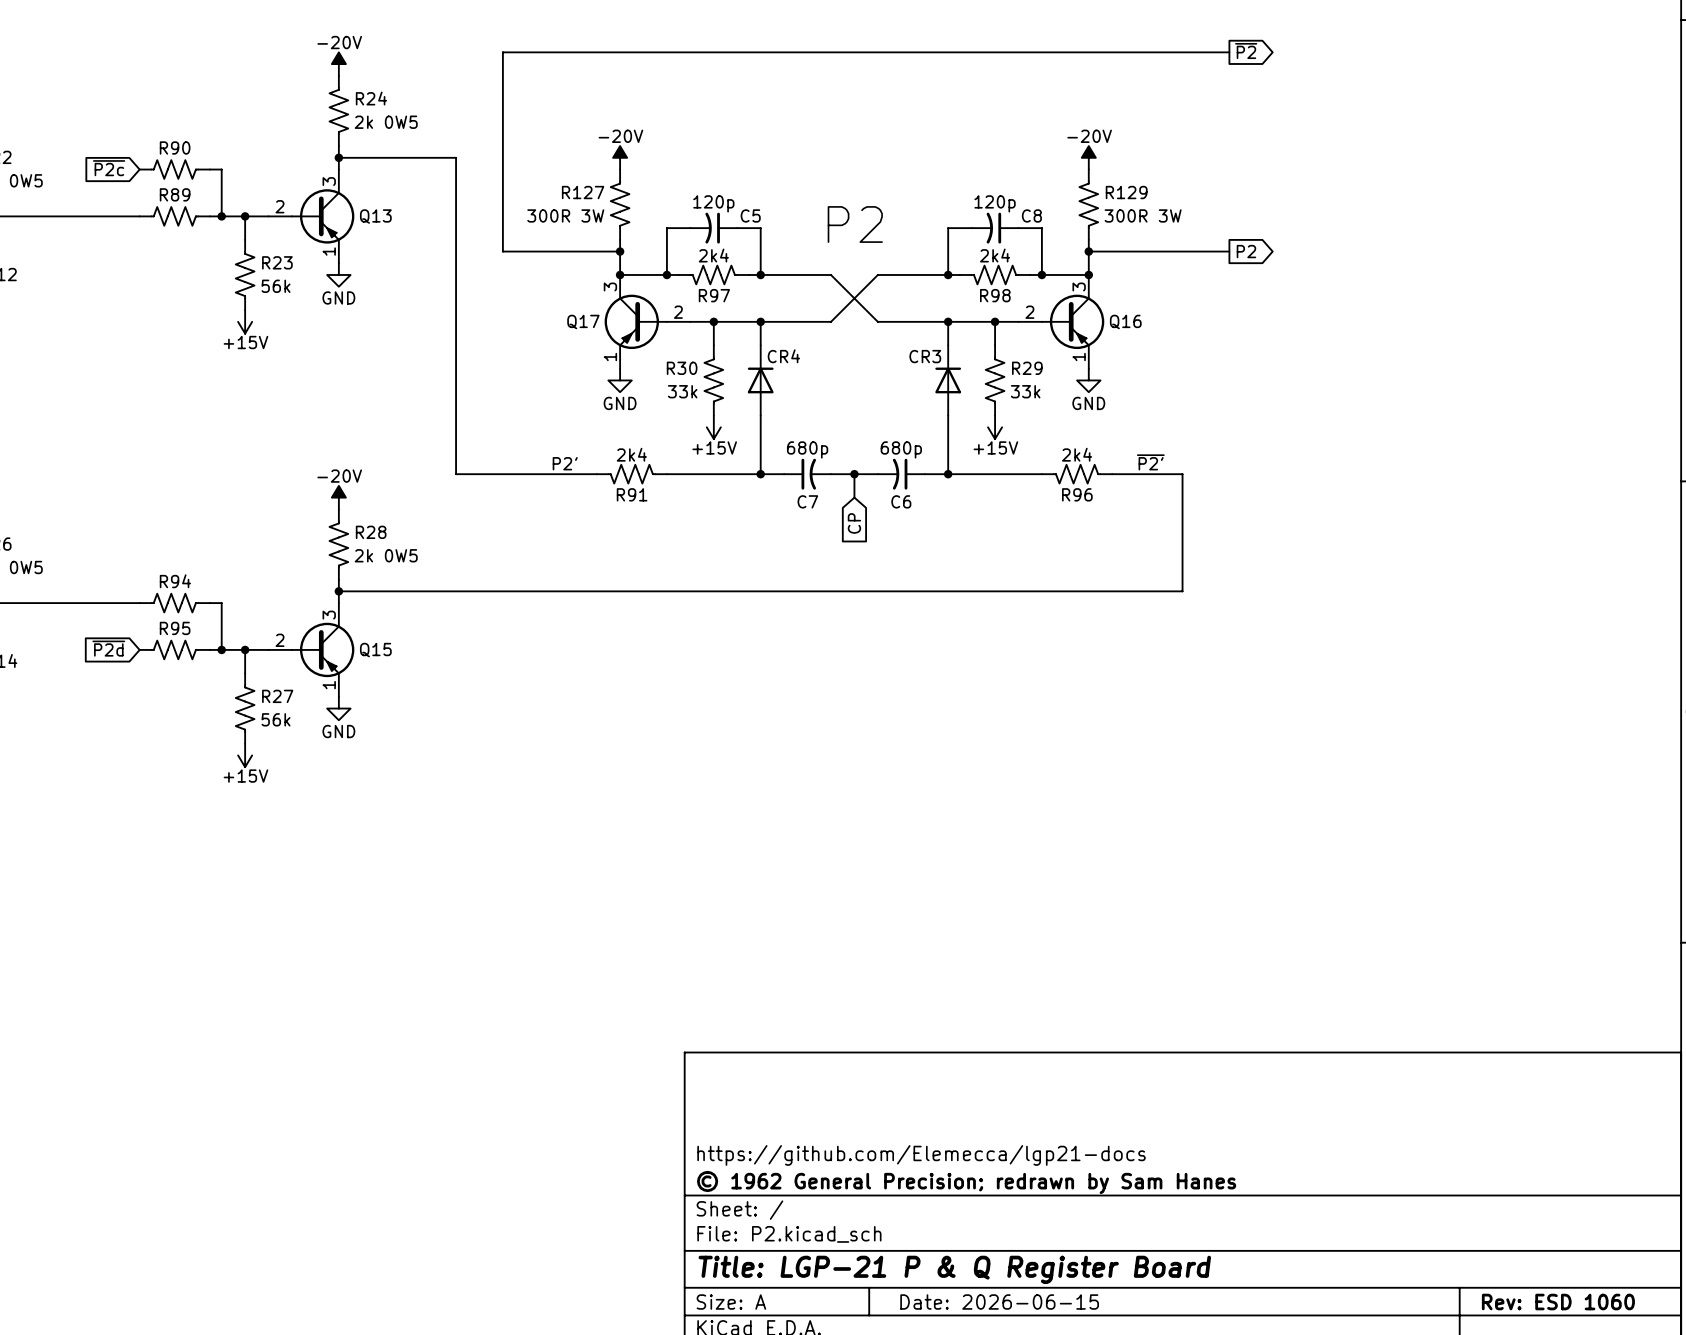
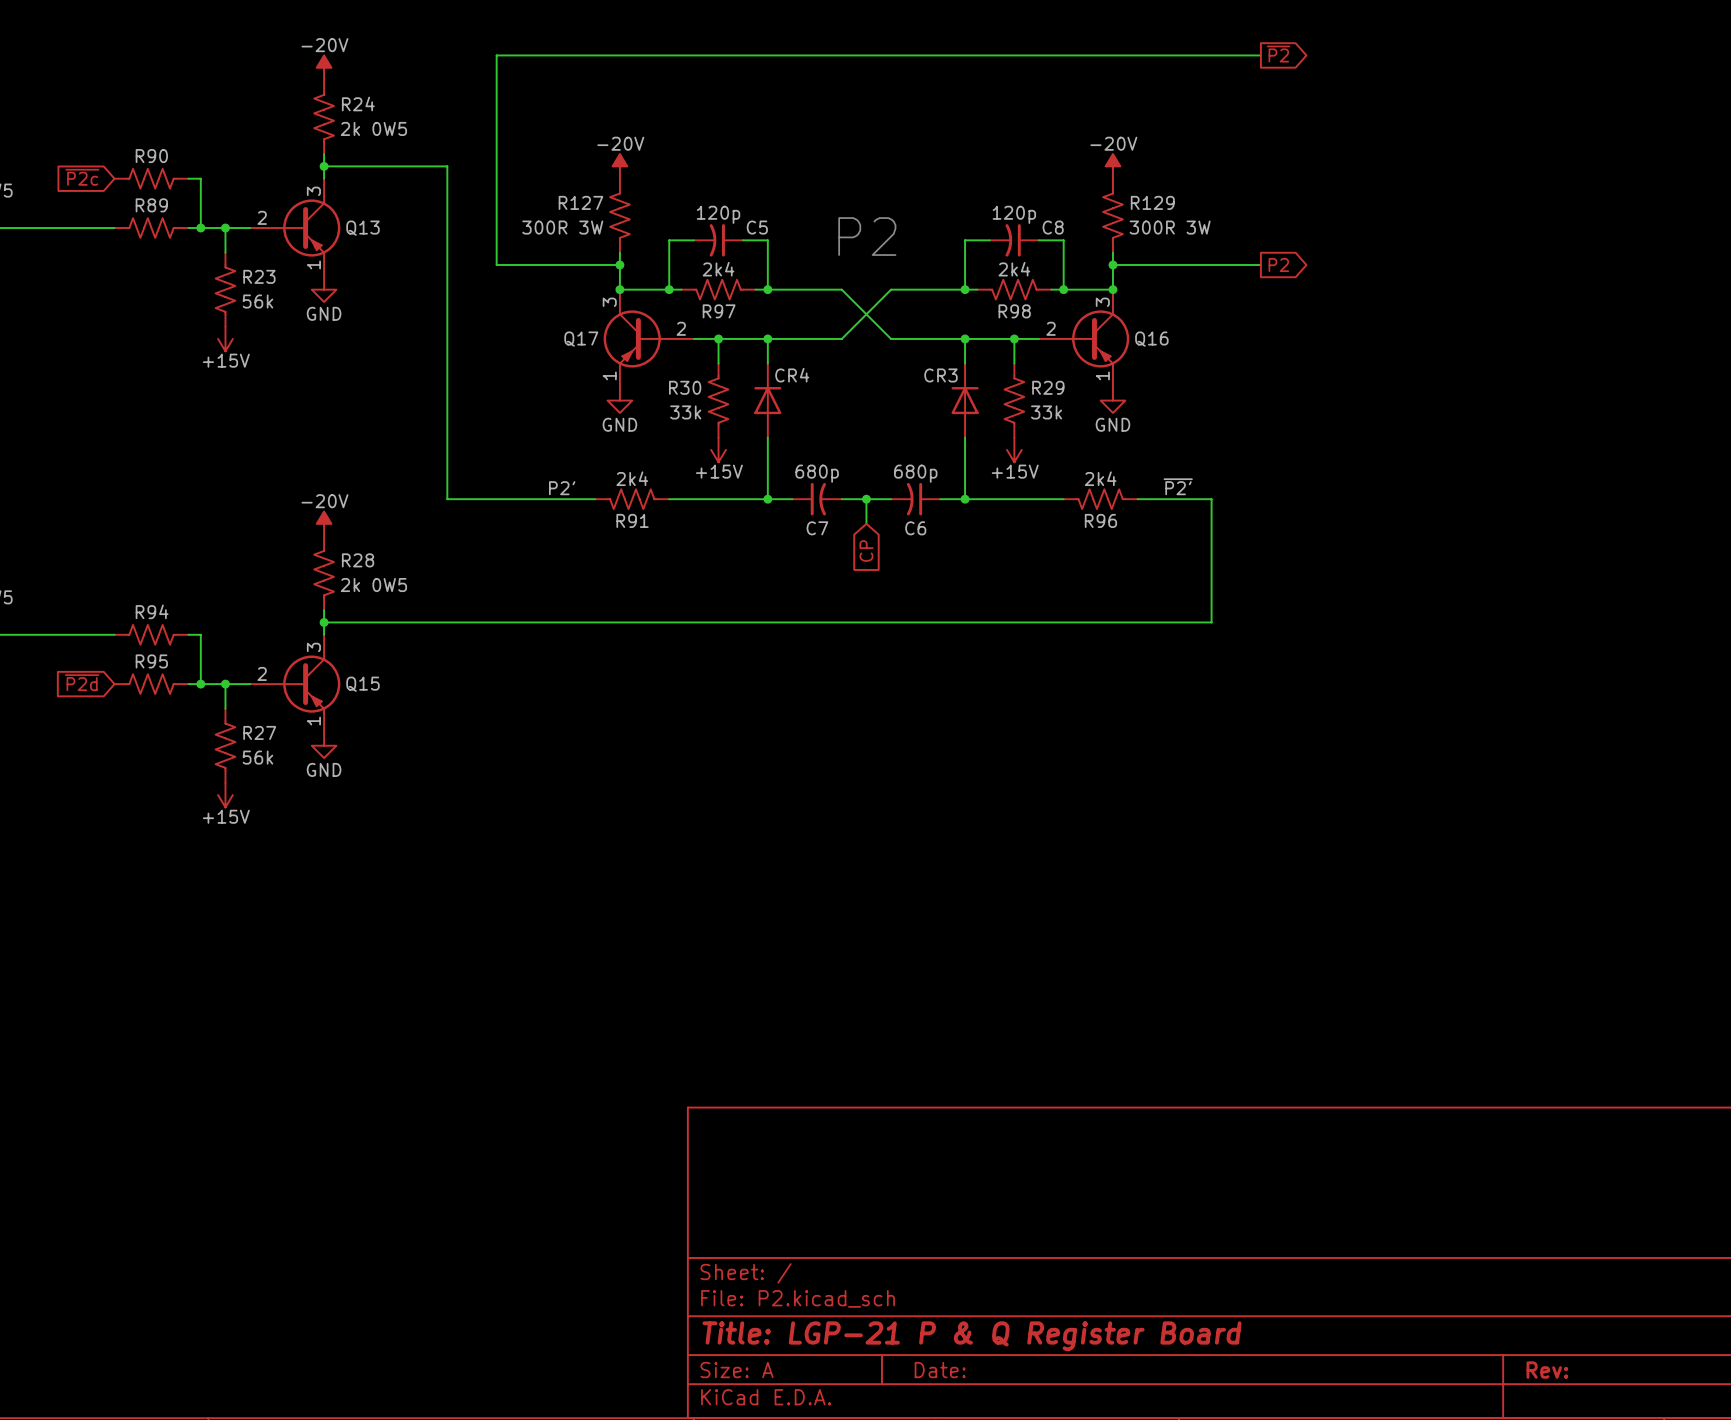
title block: https://github.com/Elemecca/lgp21-docs (921, 1155) -> none
title block: © 1962 General Precision; redrawn by Sam Hanes (966, 1182) -> none
title block: Date: 2026-06-15 (999, 1302) -> Date: (940, 1370)
title block: Rev: ESD 1060 (1558, 1302) -> Rev: (1547, 1370)

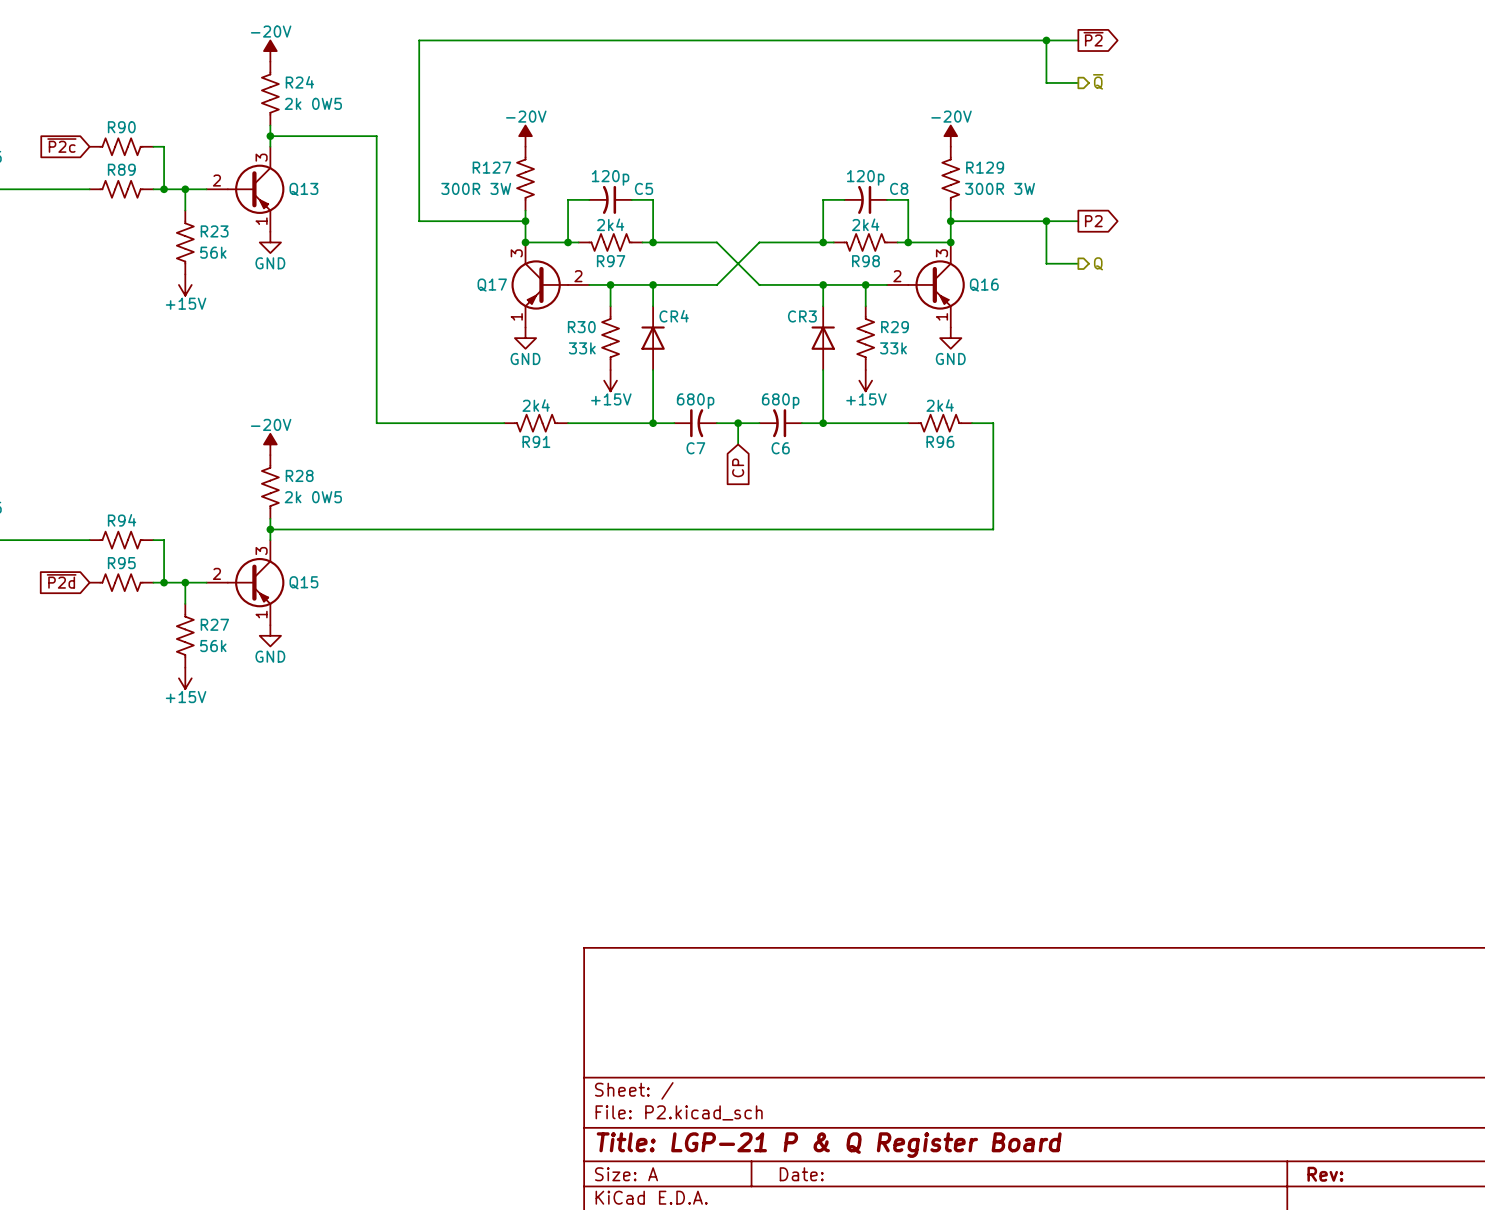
wire: none -> (1046, 40) (1046, 82) (1078, 82)
junction: none -> (1046, 40)
hierarchical label: none -> ~{Q} (1098, 81)
text: P2 (867, 236) -> none
wire: none -> (1046, 221) (1046, 263) (1078, 263)
junction: none -> (1046, 221)
hierarchical label: none -> Q (1098, 263)
label: ~{P2'} (1178, 486) -> none
label: P2' (562, 488) -> none
wire: (1162, 499) (1211, 499) (1211, 622) (1162, 622) -> (993, 423) (993, 529)

